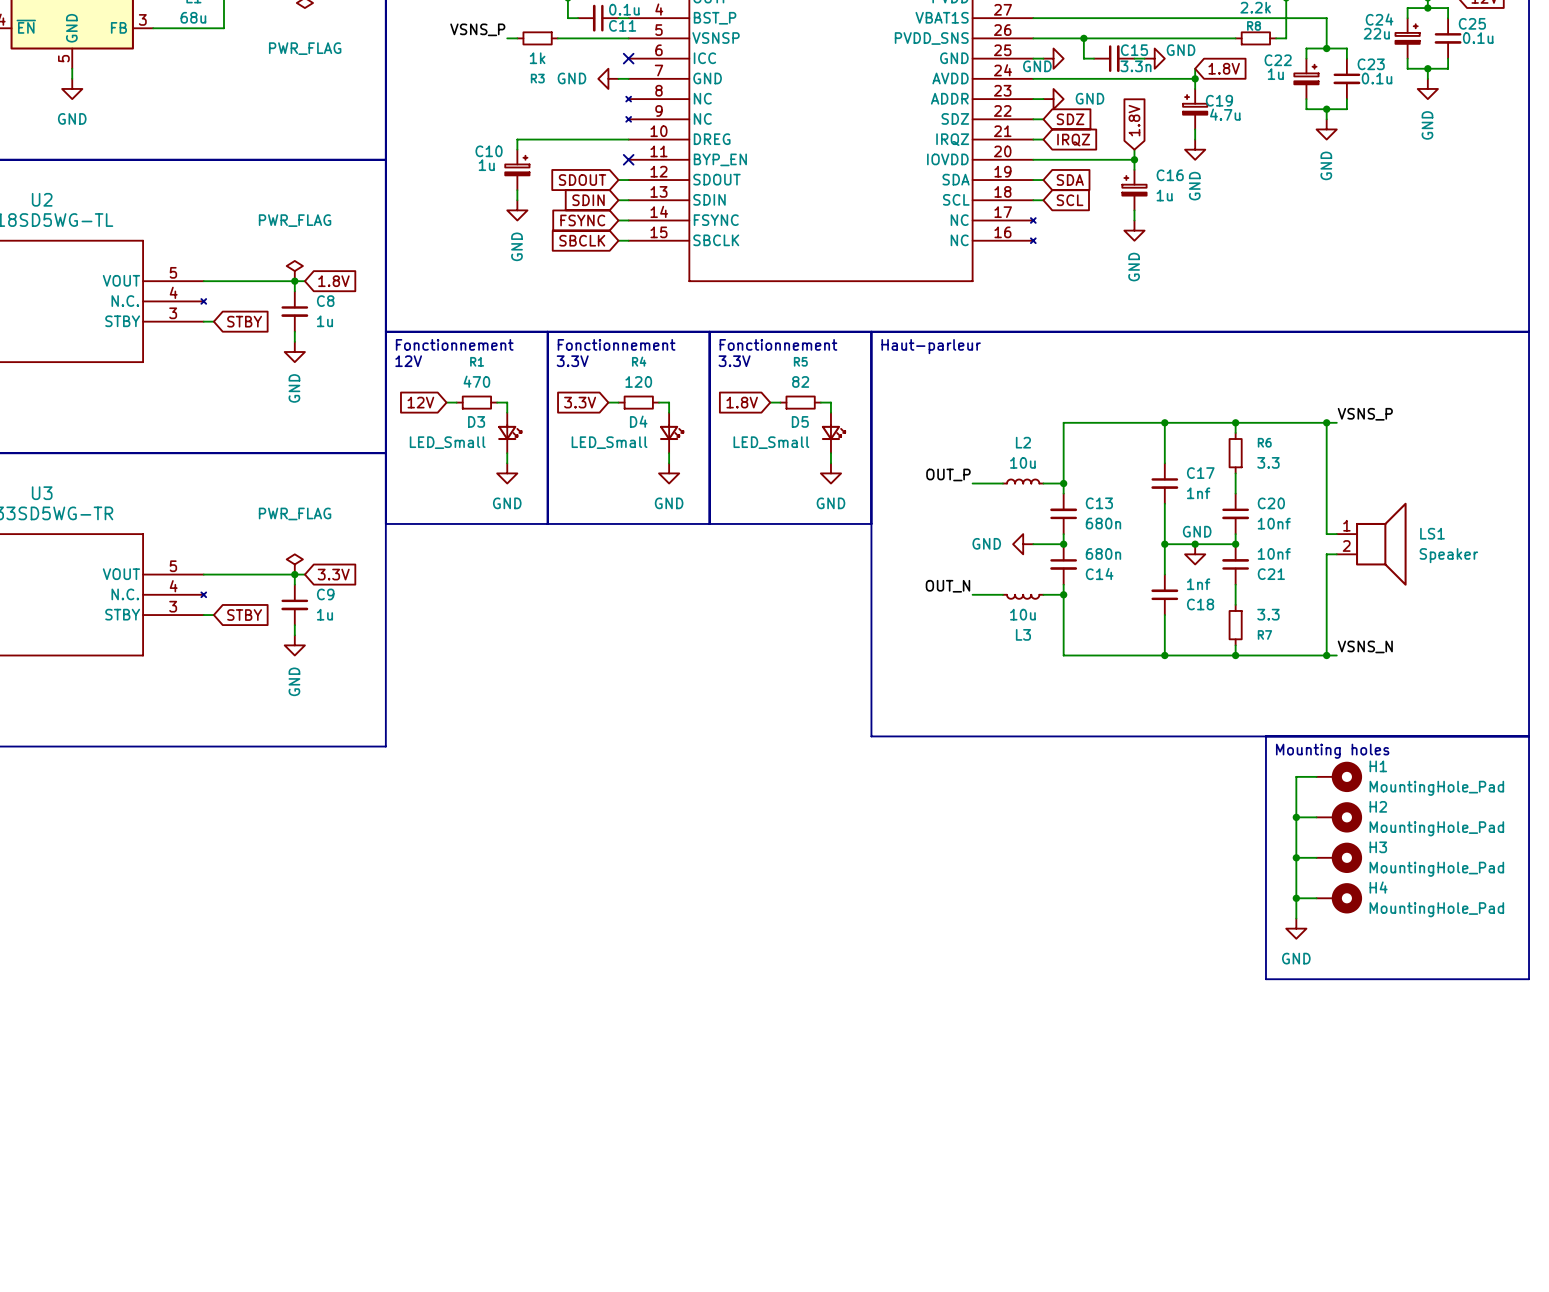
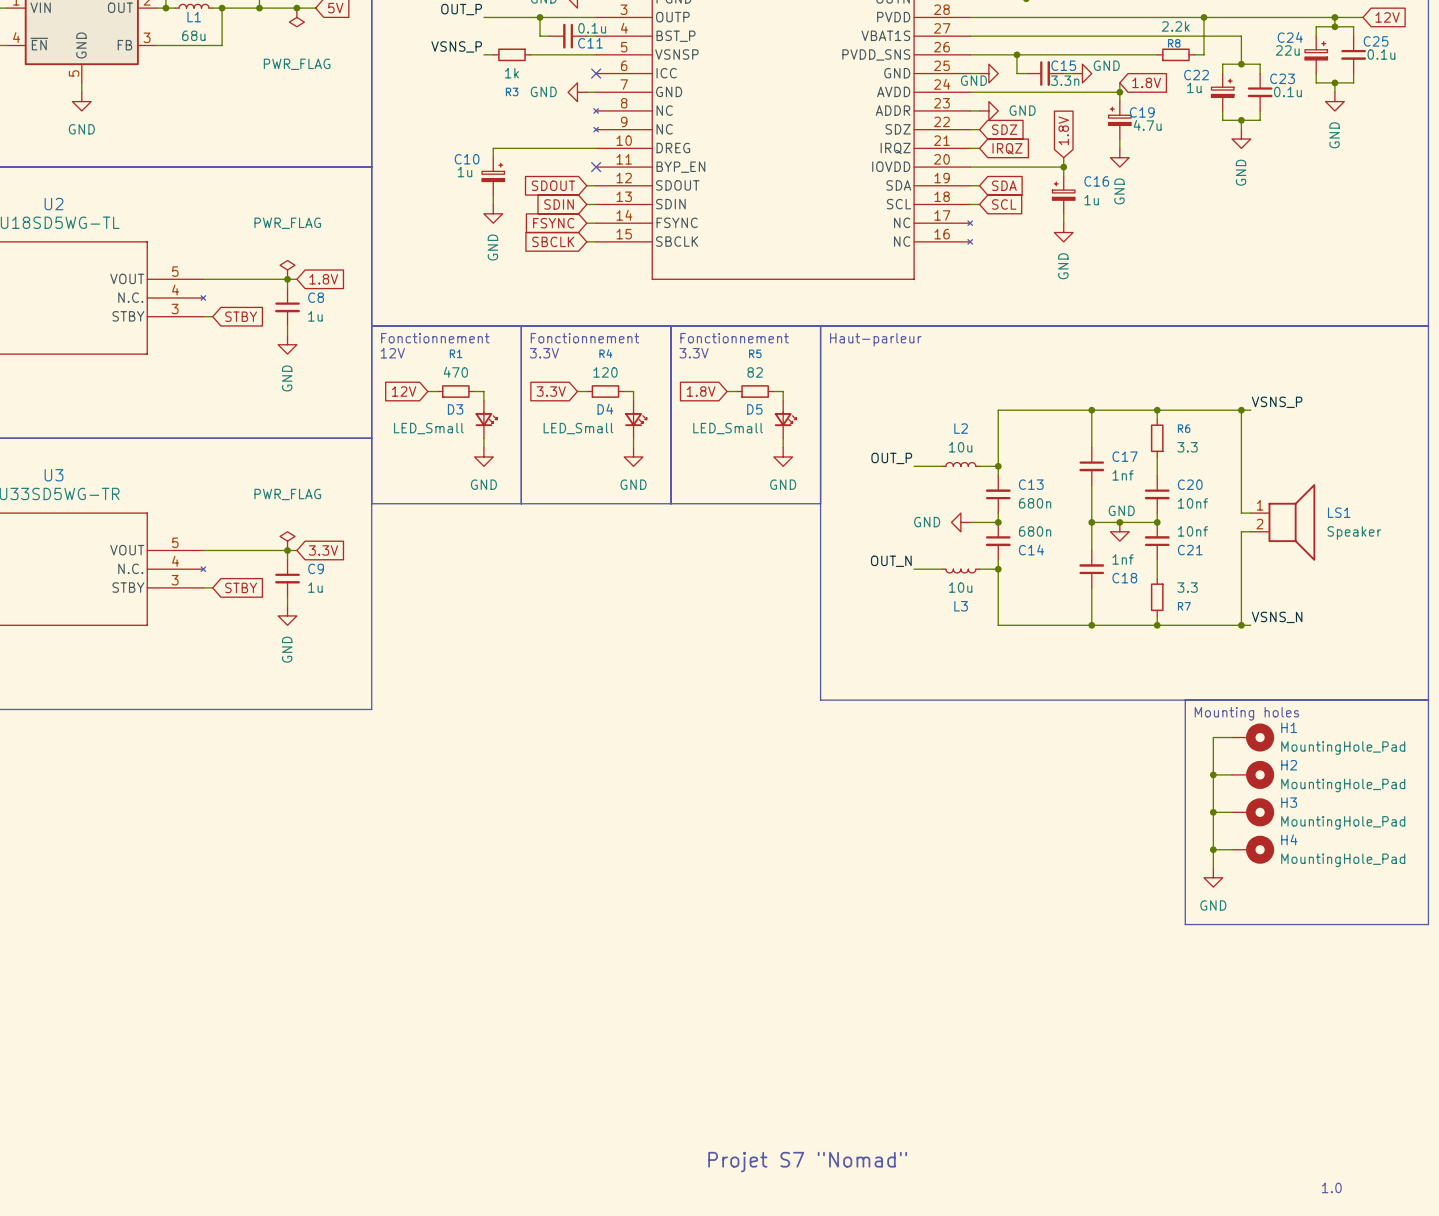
text: none -> Projet S7 "Nomad" (807, 1162)
text: none -> 1.0 (1331, 1187)

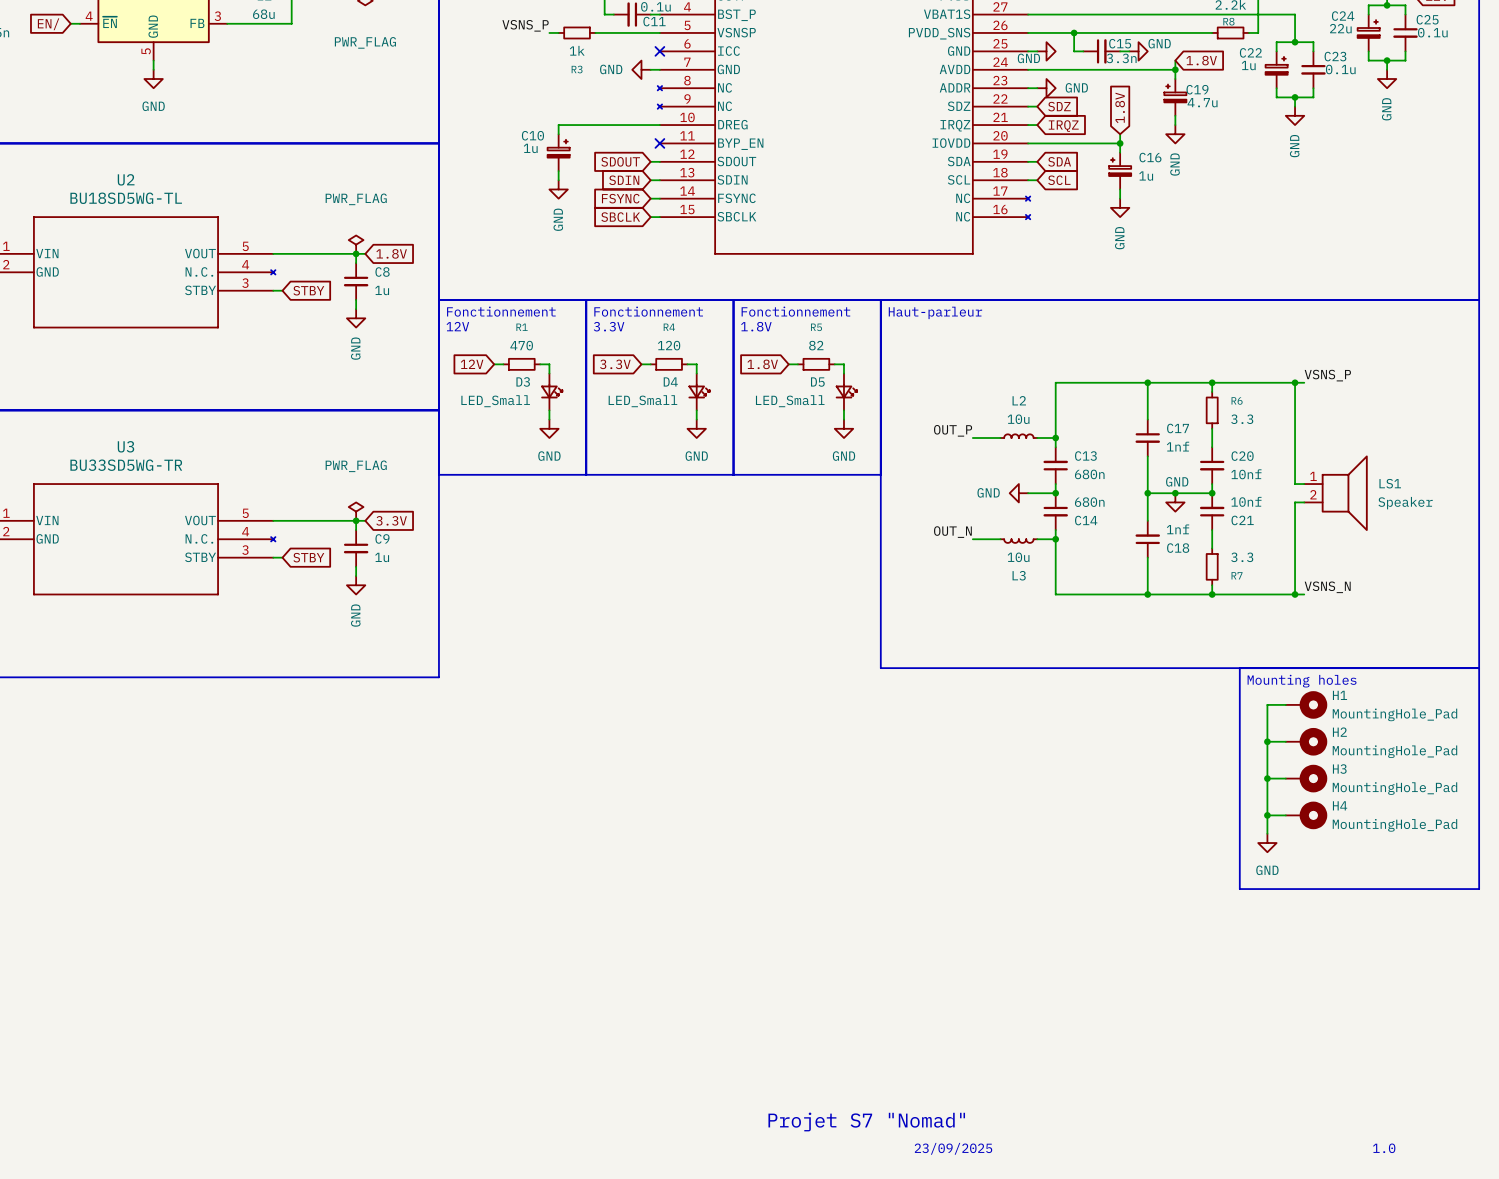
text: 3.3V (694, 353) -> 1.8V (756, 326)
text: none -> 23/09/2025 (953, 1148)

